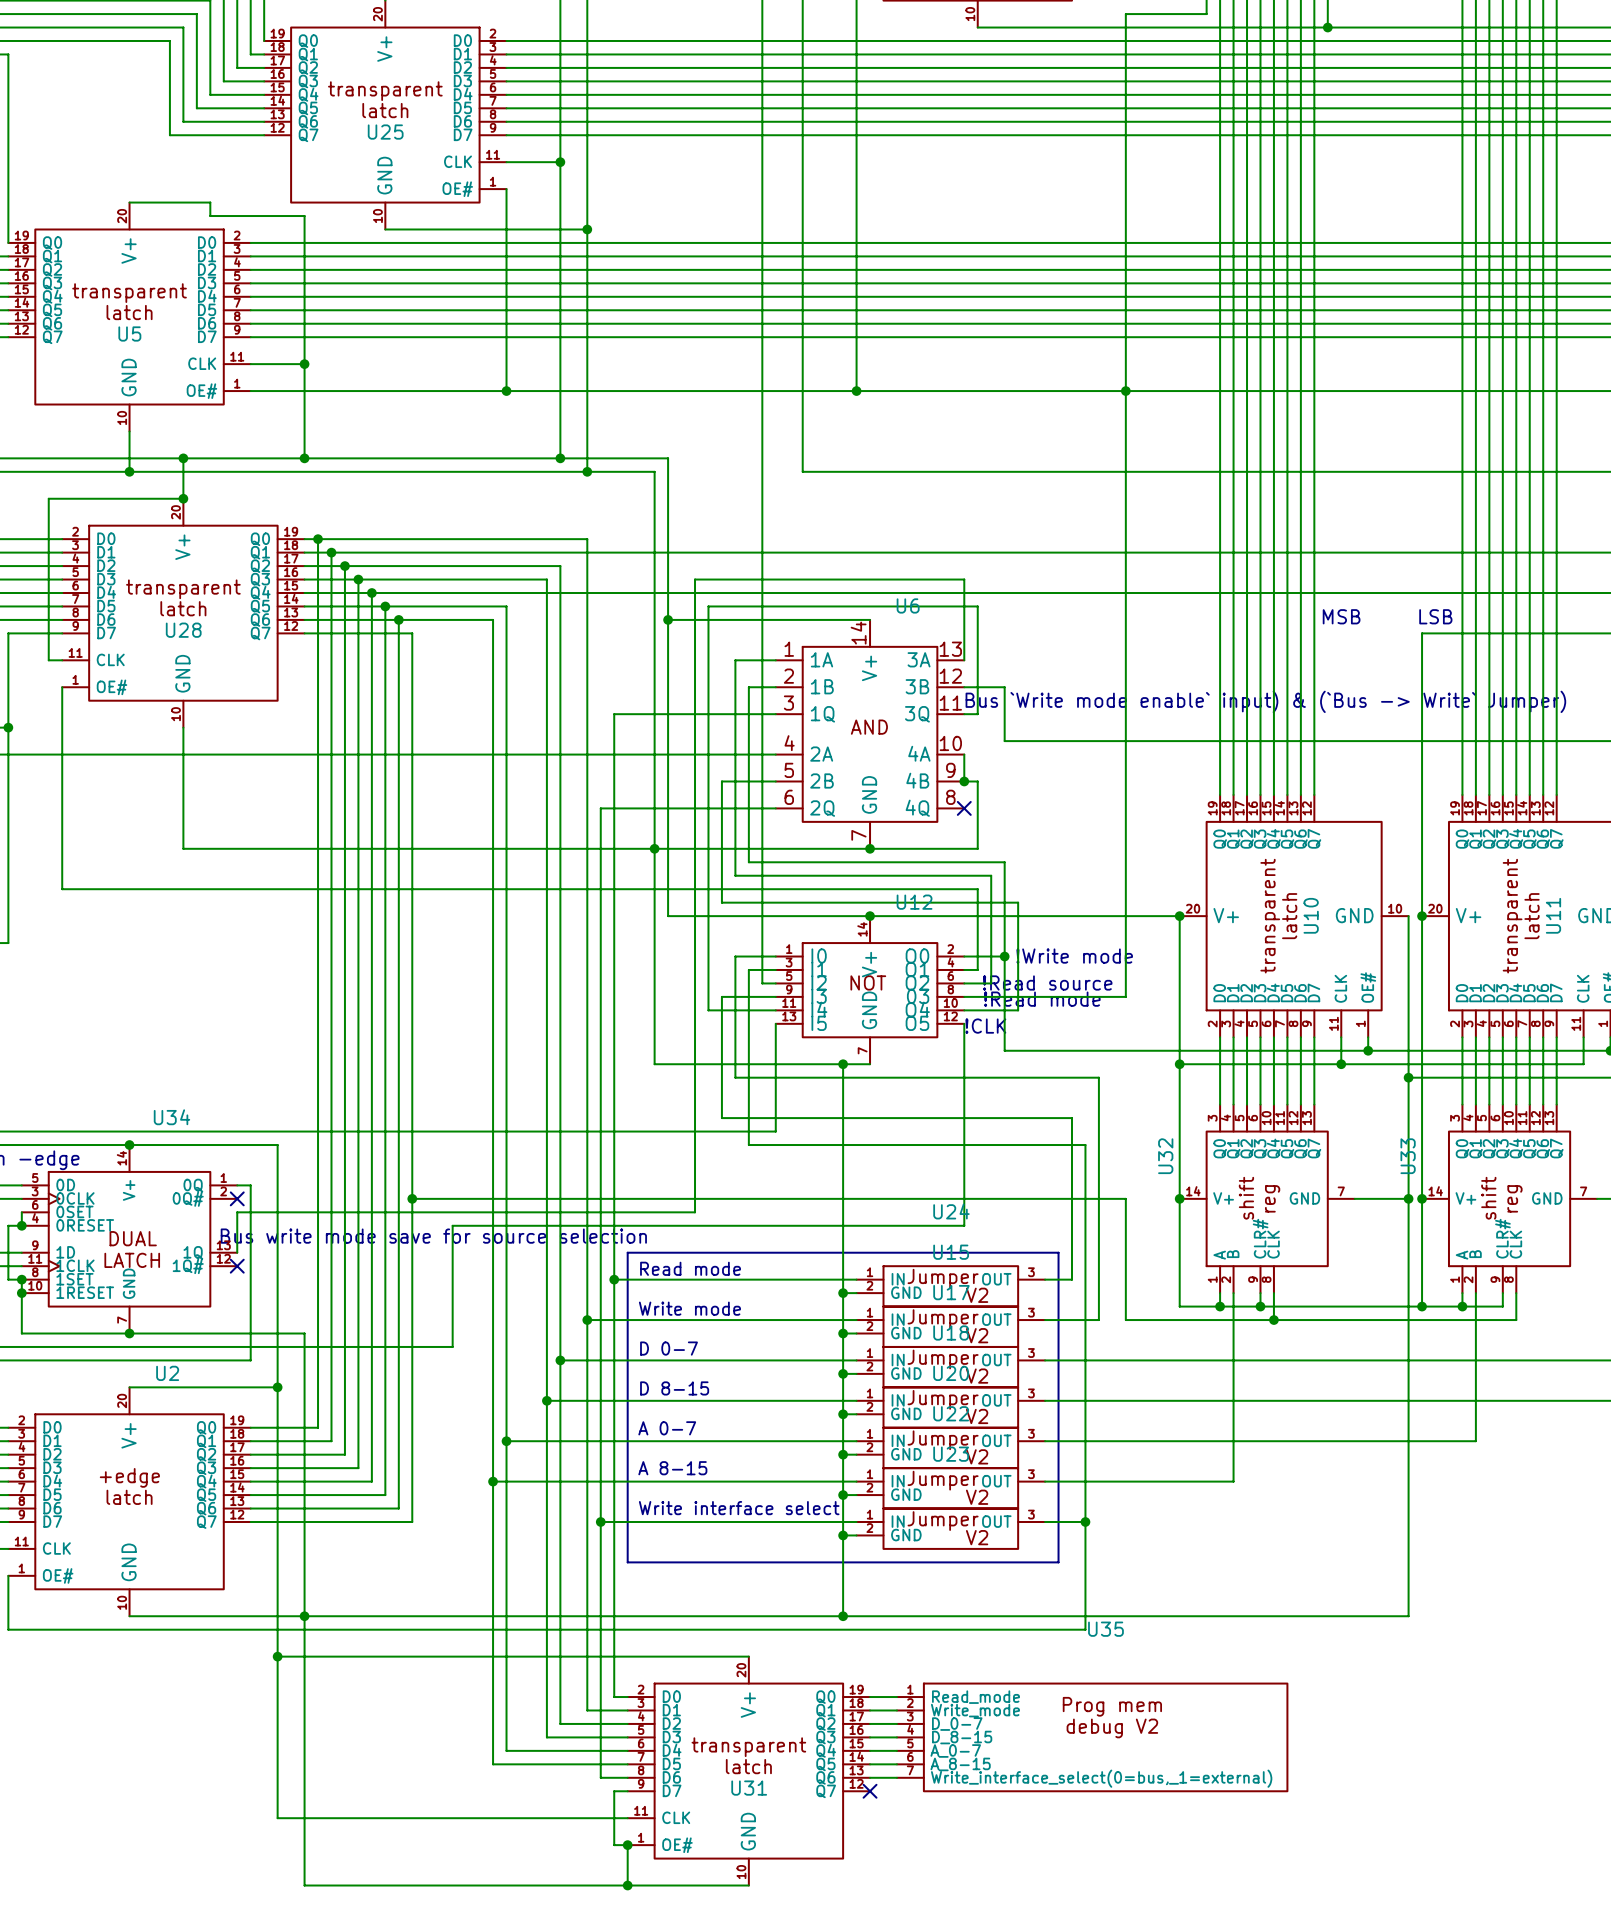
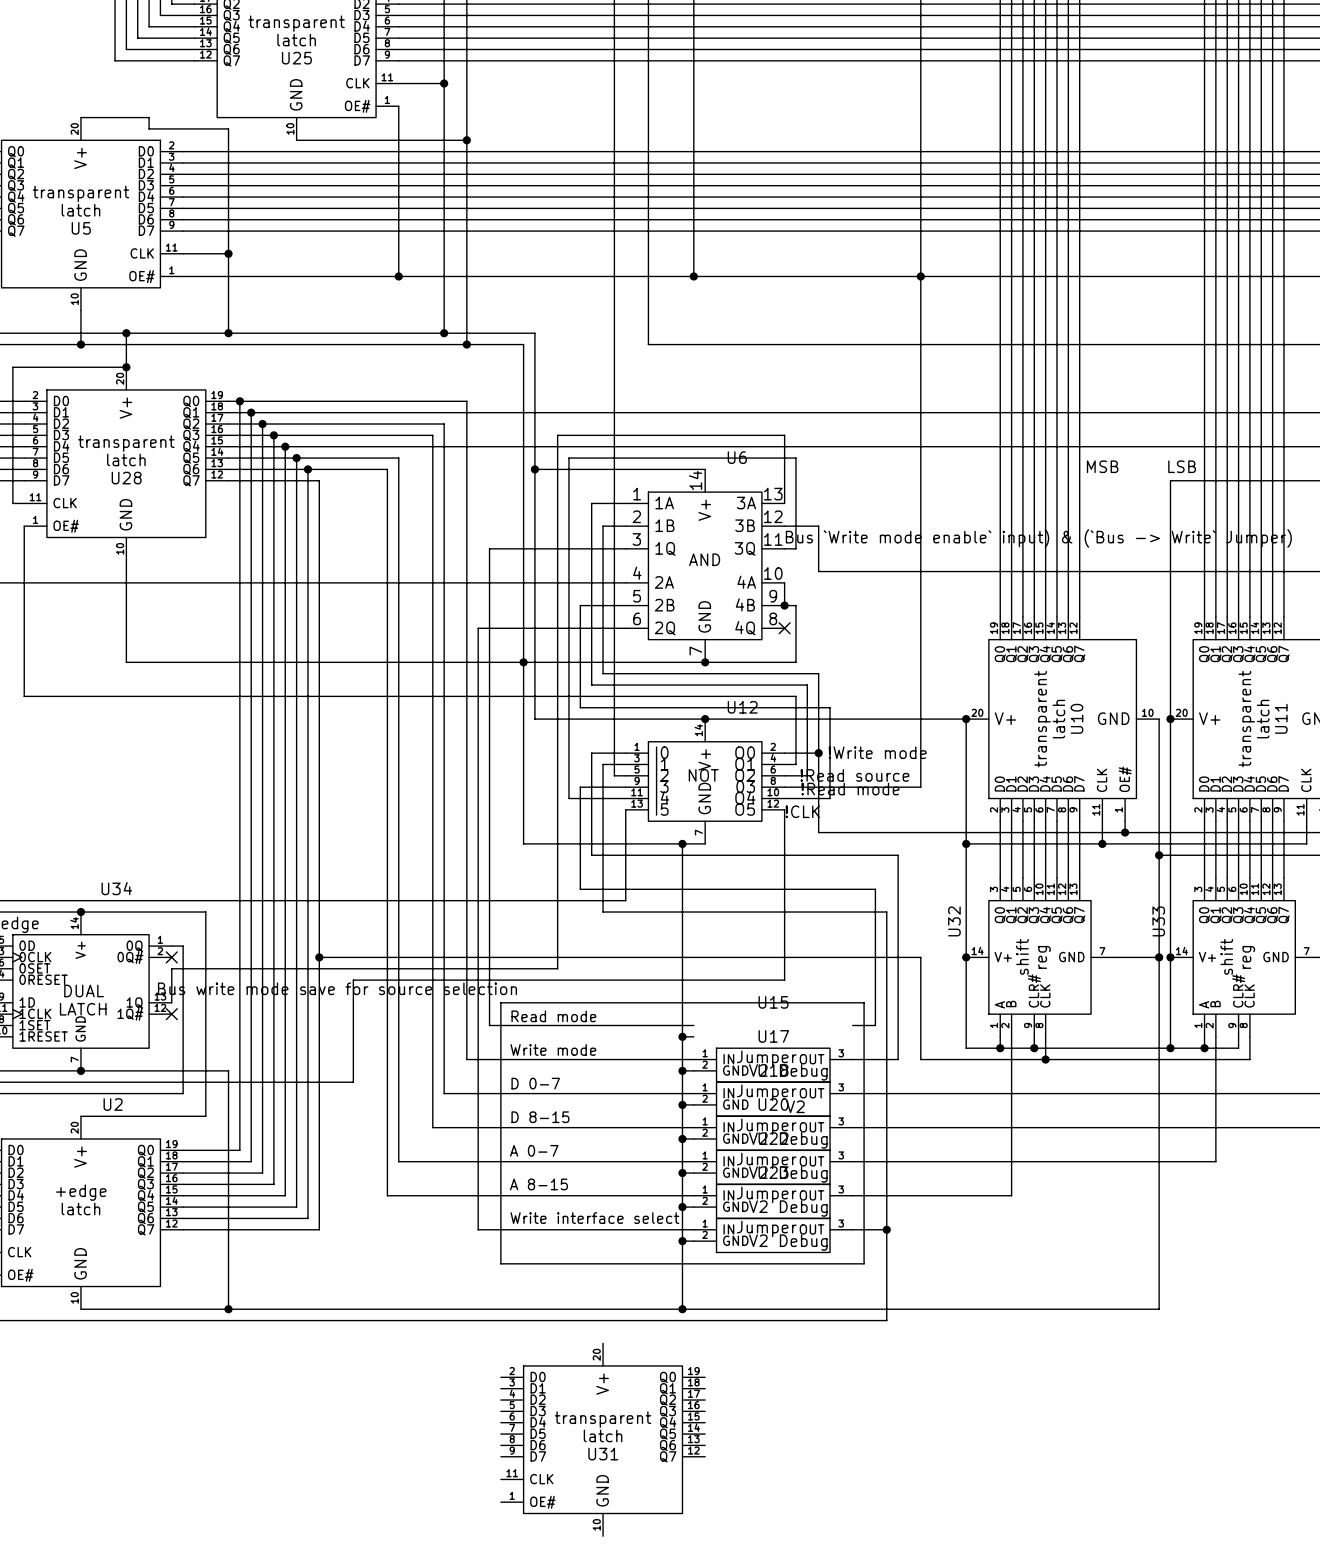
wire: (614, 1279) (614, 1697) (627, 1697) -> none
junction: (614, 1279) -> none
U24: (950, 1286) -> none
wire: (587, 1320) (587, 1710) (627, 1710) -> none
junction: (587, 1320) -> none
U15 text: none -> V2 Debug (788, 1072)
U15 text: V2 (977, 1335) -> none
wire: (560, 1360) (560, 1723) (627, 1723) -> none
junction: (560, 1360) -> none
wire: (277, 1387) (277, 1818) (627, 1818) -> none
junction: (277, 1387) -> none
wire: (546, 1400) (546, 1737) (627, 1737) -> none
junction: (546, 1400) -> none
U18 text: none -> V2 Debug (788, 1140)
U18 text: V2 (977, 1416) -> none
wire: (506, 1441) (506, 1750) (627, 1750) -> none
junction: (506, 1441) -> none
U20 text: none -> V2 Debug (788, 1174)
U20 text: V2 (977, 1456) -> none
wire: (493, 1481) (493, 1764) (627, 1764) -> none
junction: (493, 1481) -> none
U22 text: none -> V2 Debug (788, 1208)
U22 text: V2 (977, 1497) -> none
wire: (600, 1521) (600, 1777) (627, 1777) -> none
junction: (600, 1521) -> none
U23 text: none -> V2 Debug (788, 1242)
U23 text: V2 (977, 1537) -> none
wire: (304, 1616) (304, 1885) (748, 1885) -> none
wire: (277, 1656) (748, 1656) -> none
junction: (277, 1656) -> none
wire: (870, 1697) (896, 1697) -> none
wire: (870, 1710) (896, 1710) -> none
wire: (870, 1723) (896, 1723) -> none
wire: (870, 1737) (896, 1737) -> none
U35: (1092, 1737) -> none
wire: (870, 1750) (896, 1750) -> none
wire: (870, 1764) (896, 1764) -> none
wire: (870, 1777) (896, 1777) -> none
wire: (627, 1791) (614, 1791) (614, 1845) (627, 1845) (627, 1885) -> none
no-connect mark: (870, 1791) -> none
junction: (627, 1845) -> none
junction: (627, 1885) -> none

